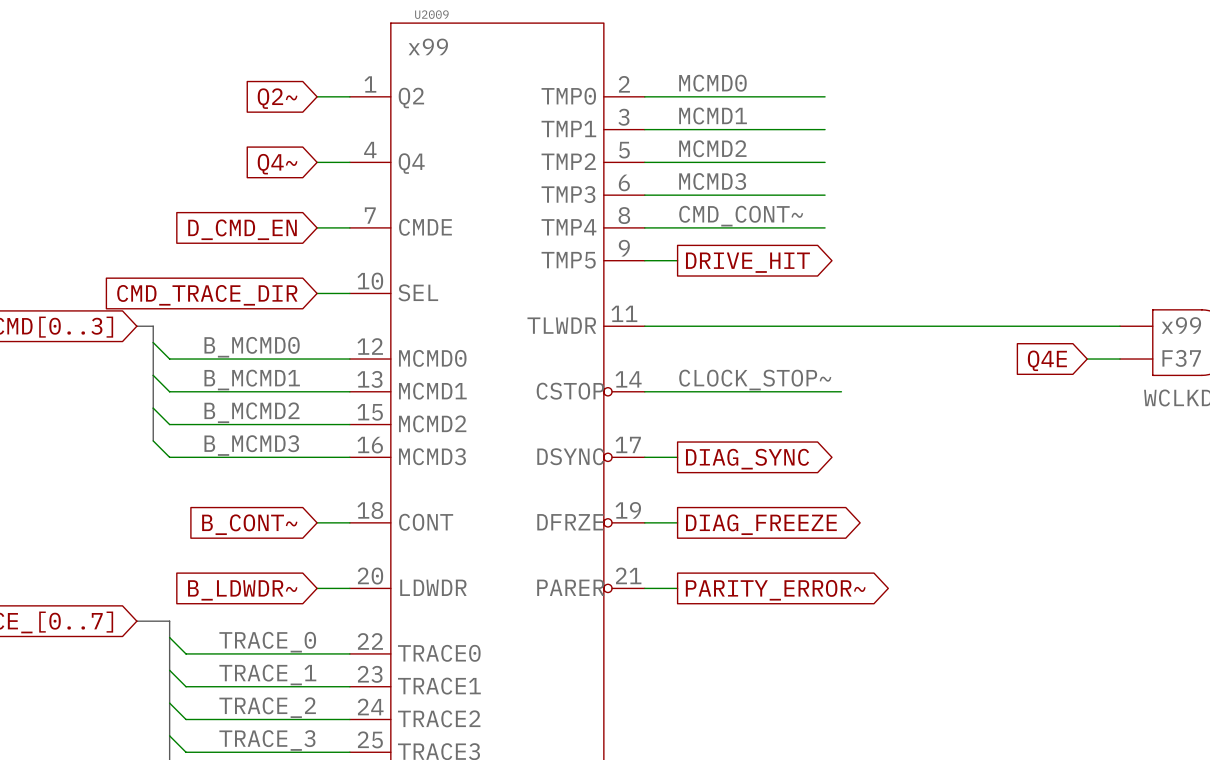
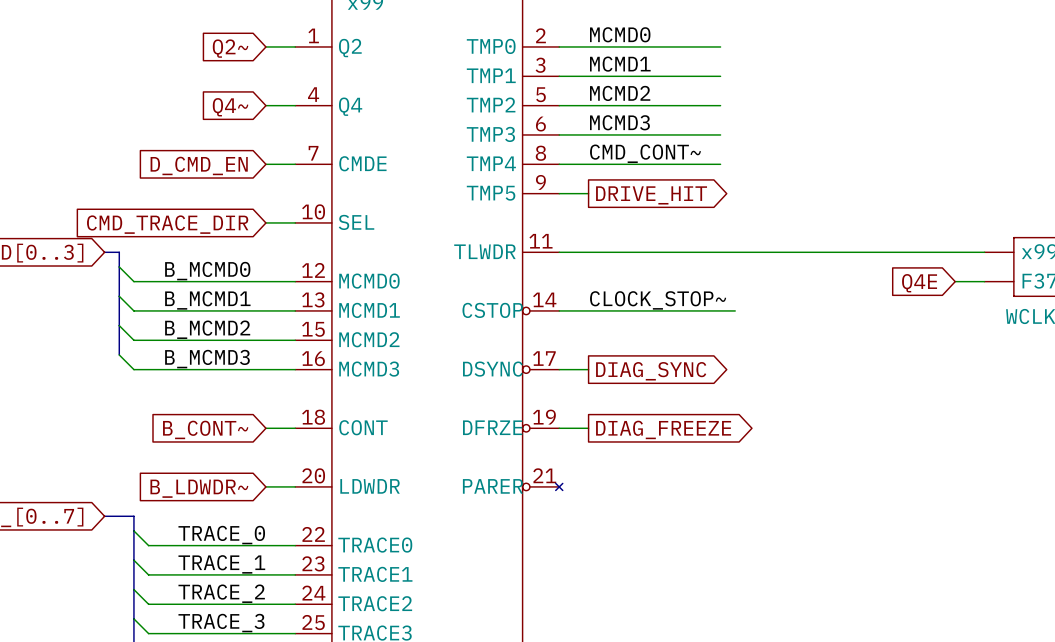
wire: (644, 588) (677, 588) -> none
no-connect mark: none -> (559, 486)
global label: PARITY_ERROR~ (775, 590) -> none

